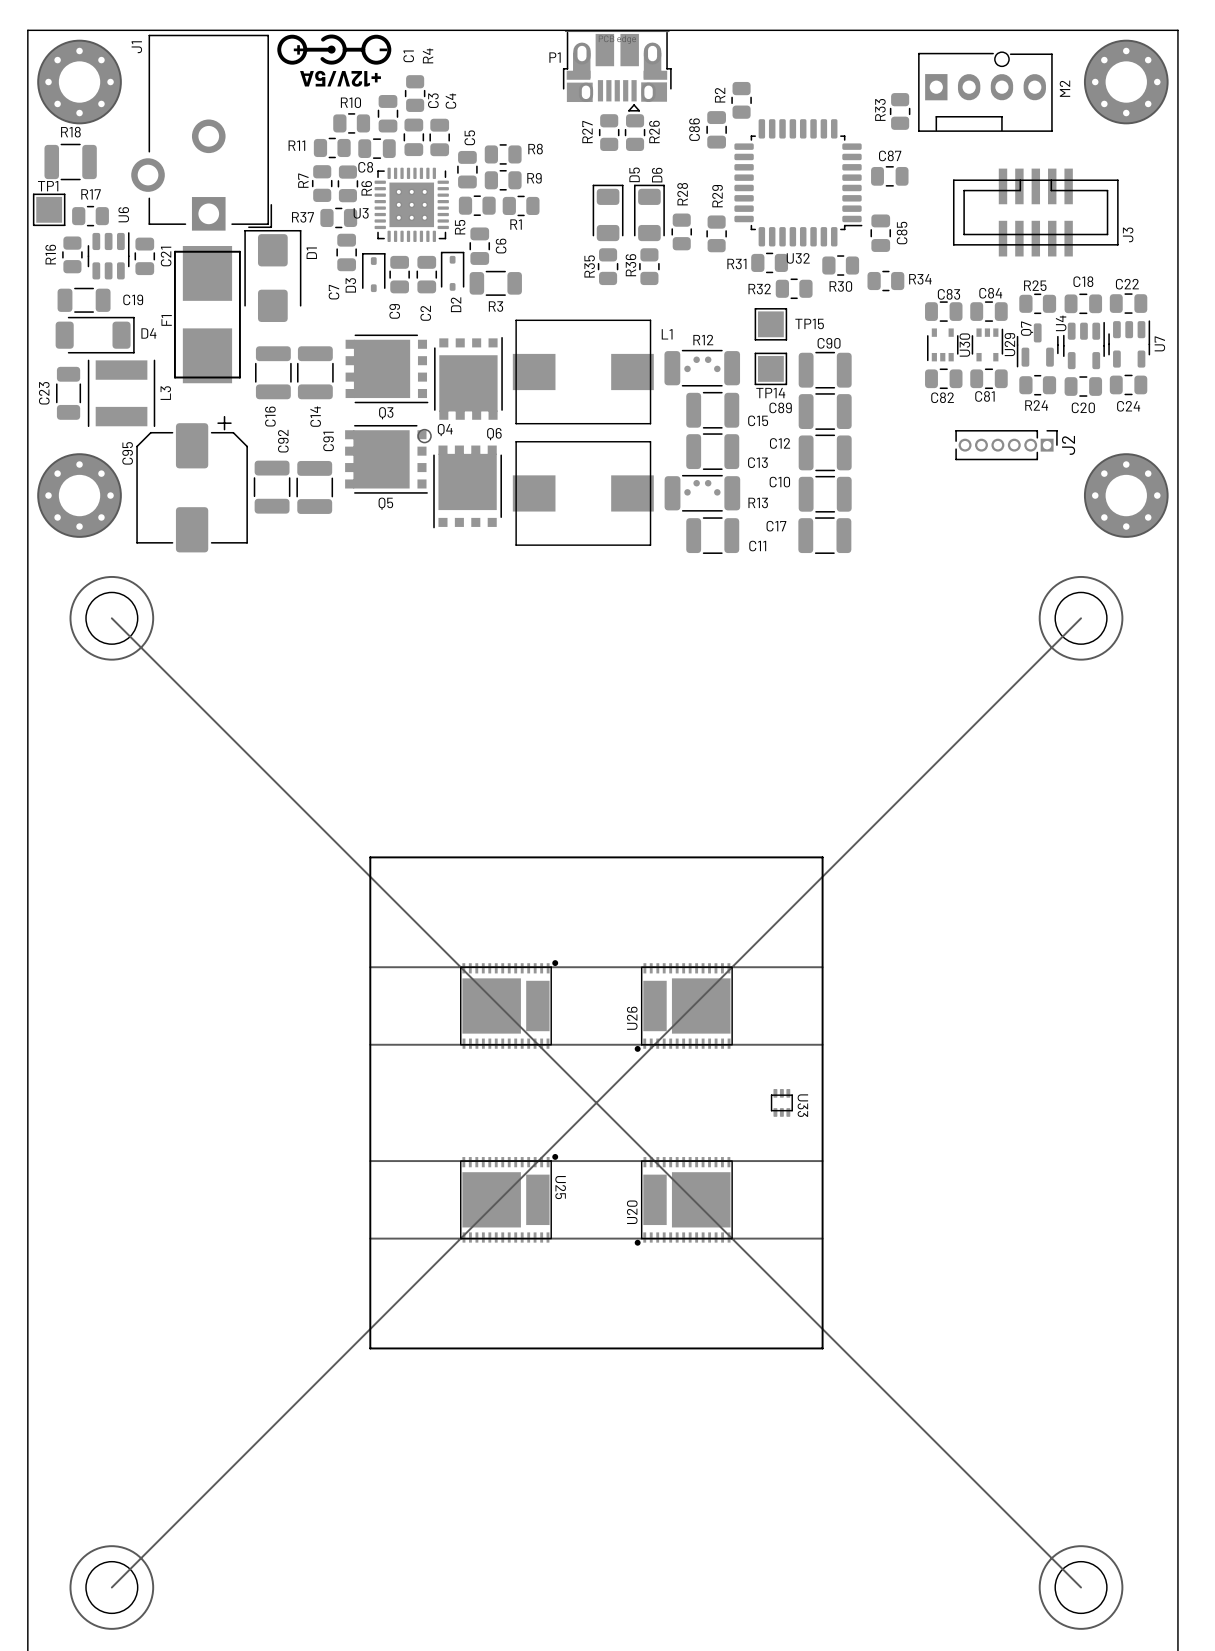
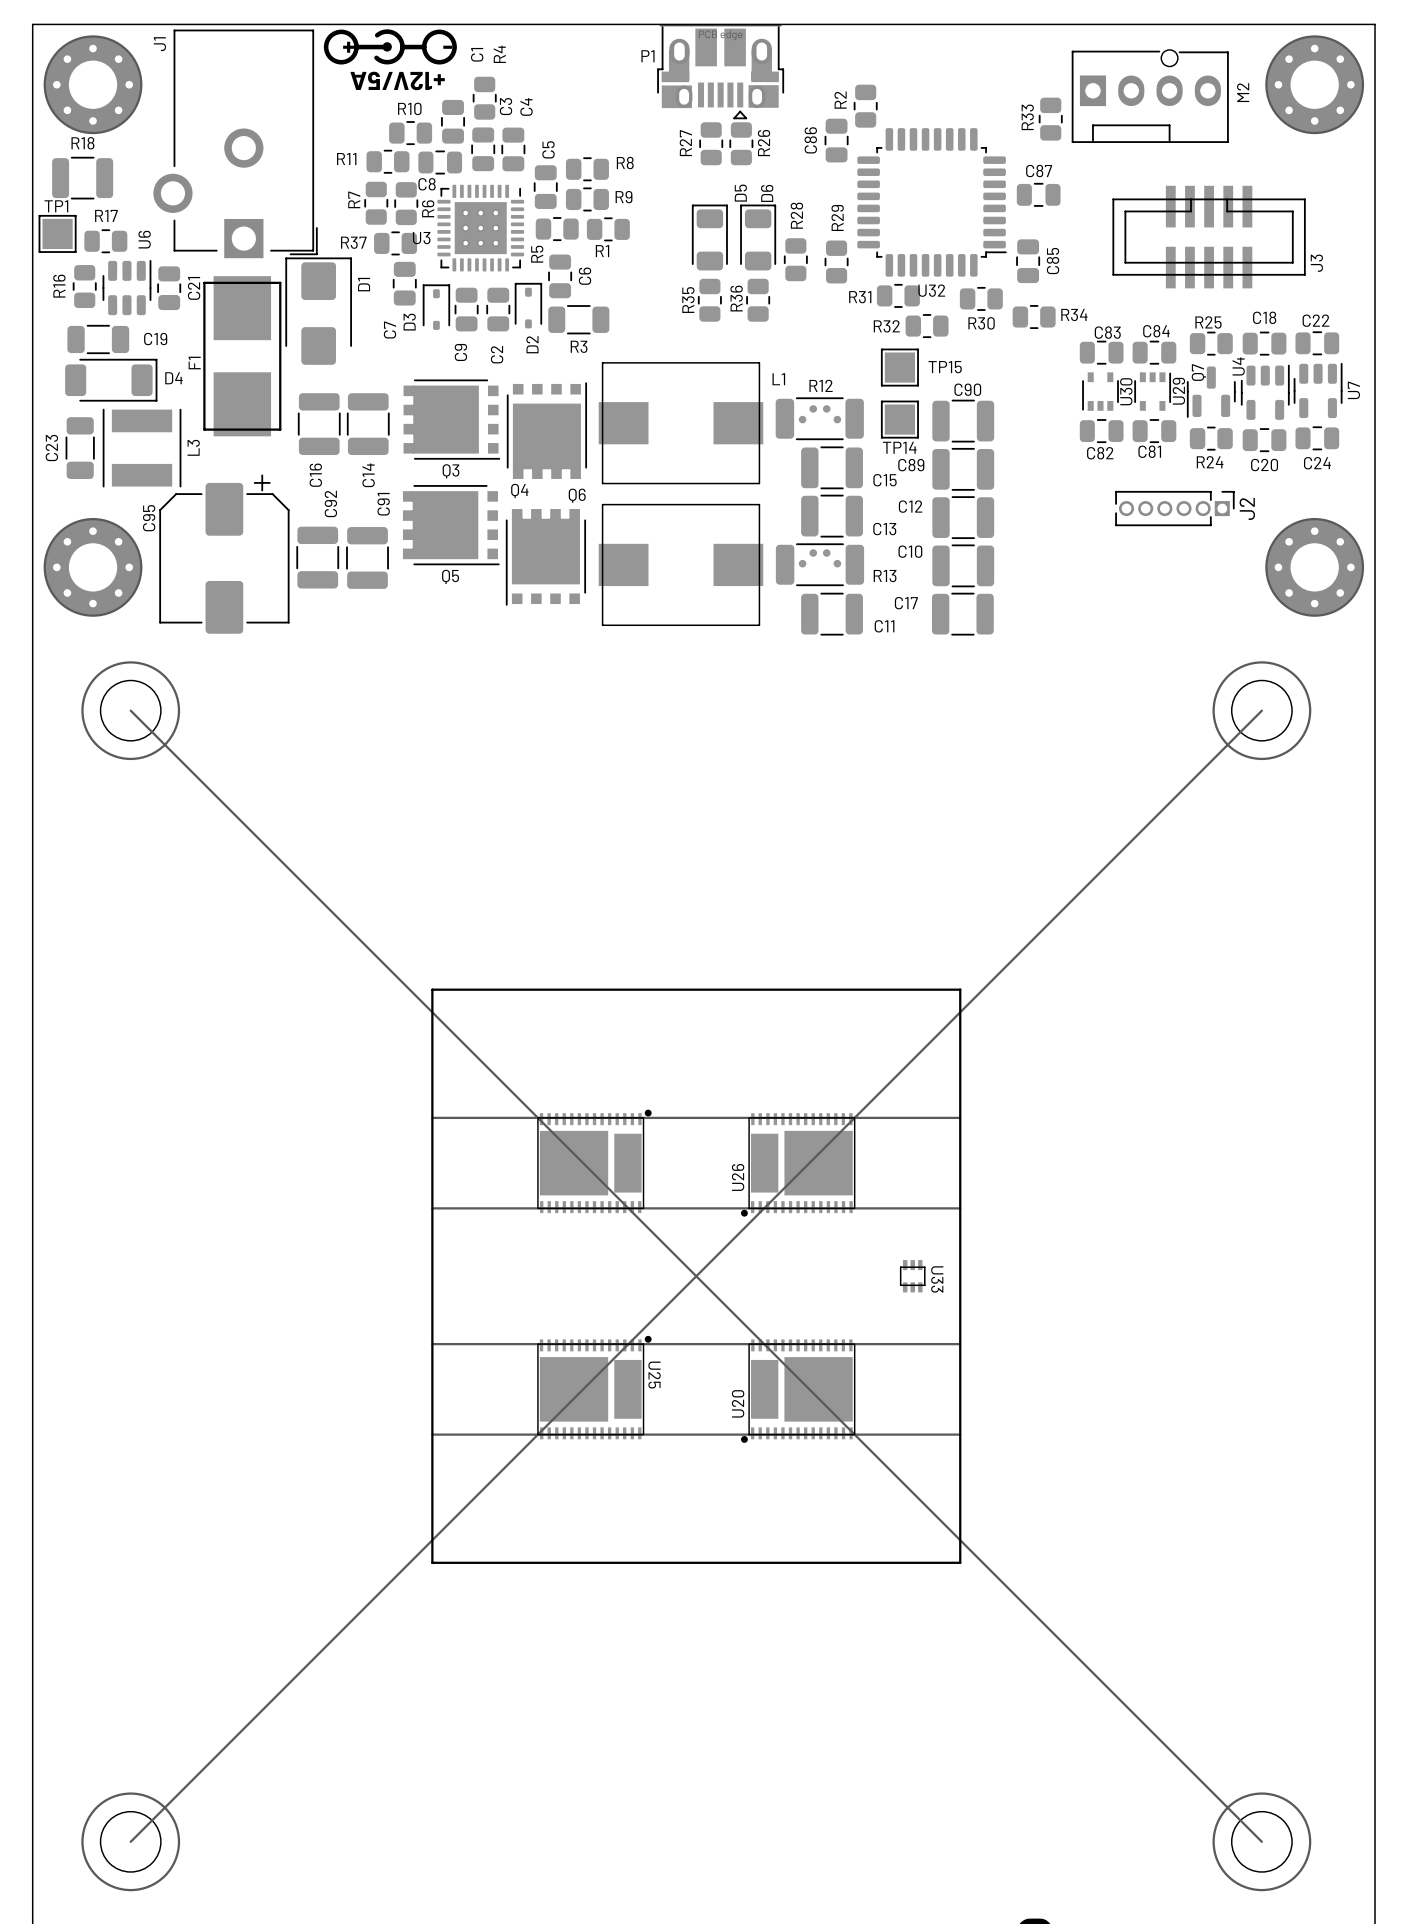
drawing: [417, 428, 432, 444] -> none

